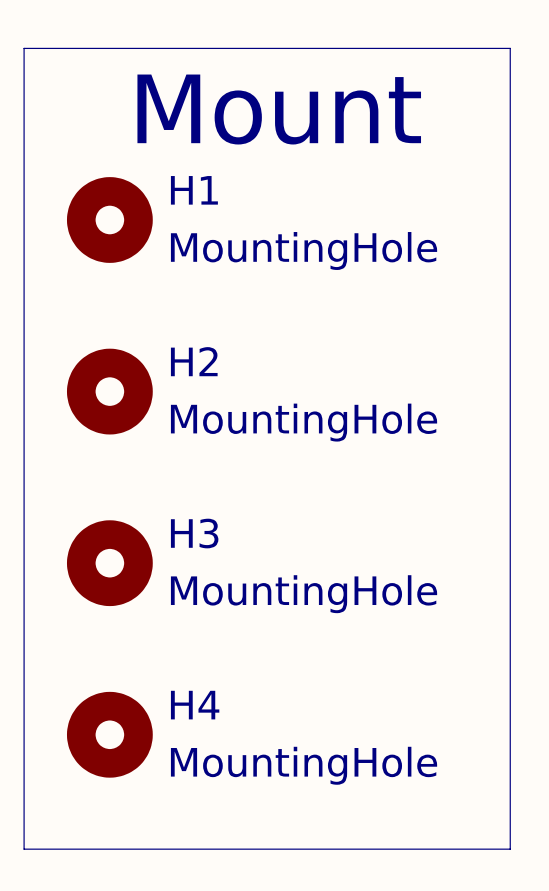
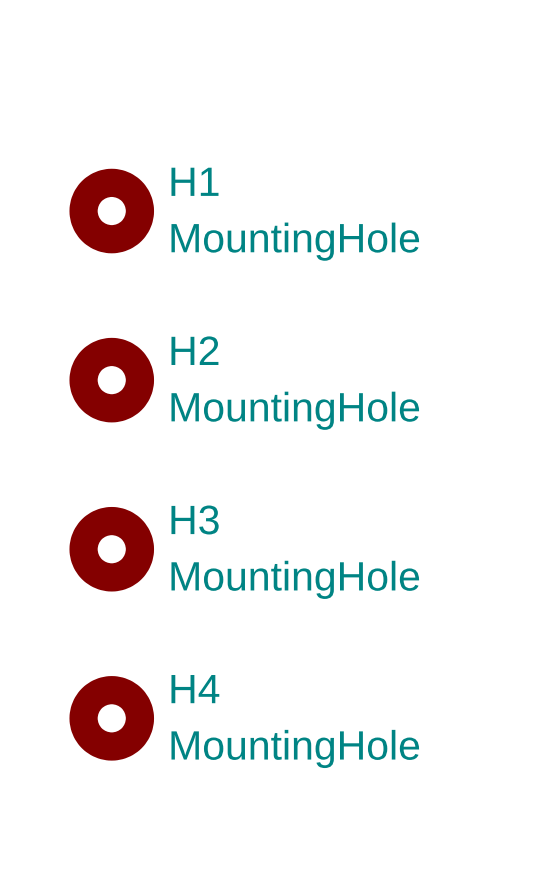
line: (24, 48) (510, 48) (510, 849) (24, 849) (24, 48) -> none
text: Mount (279, 109) -> none

